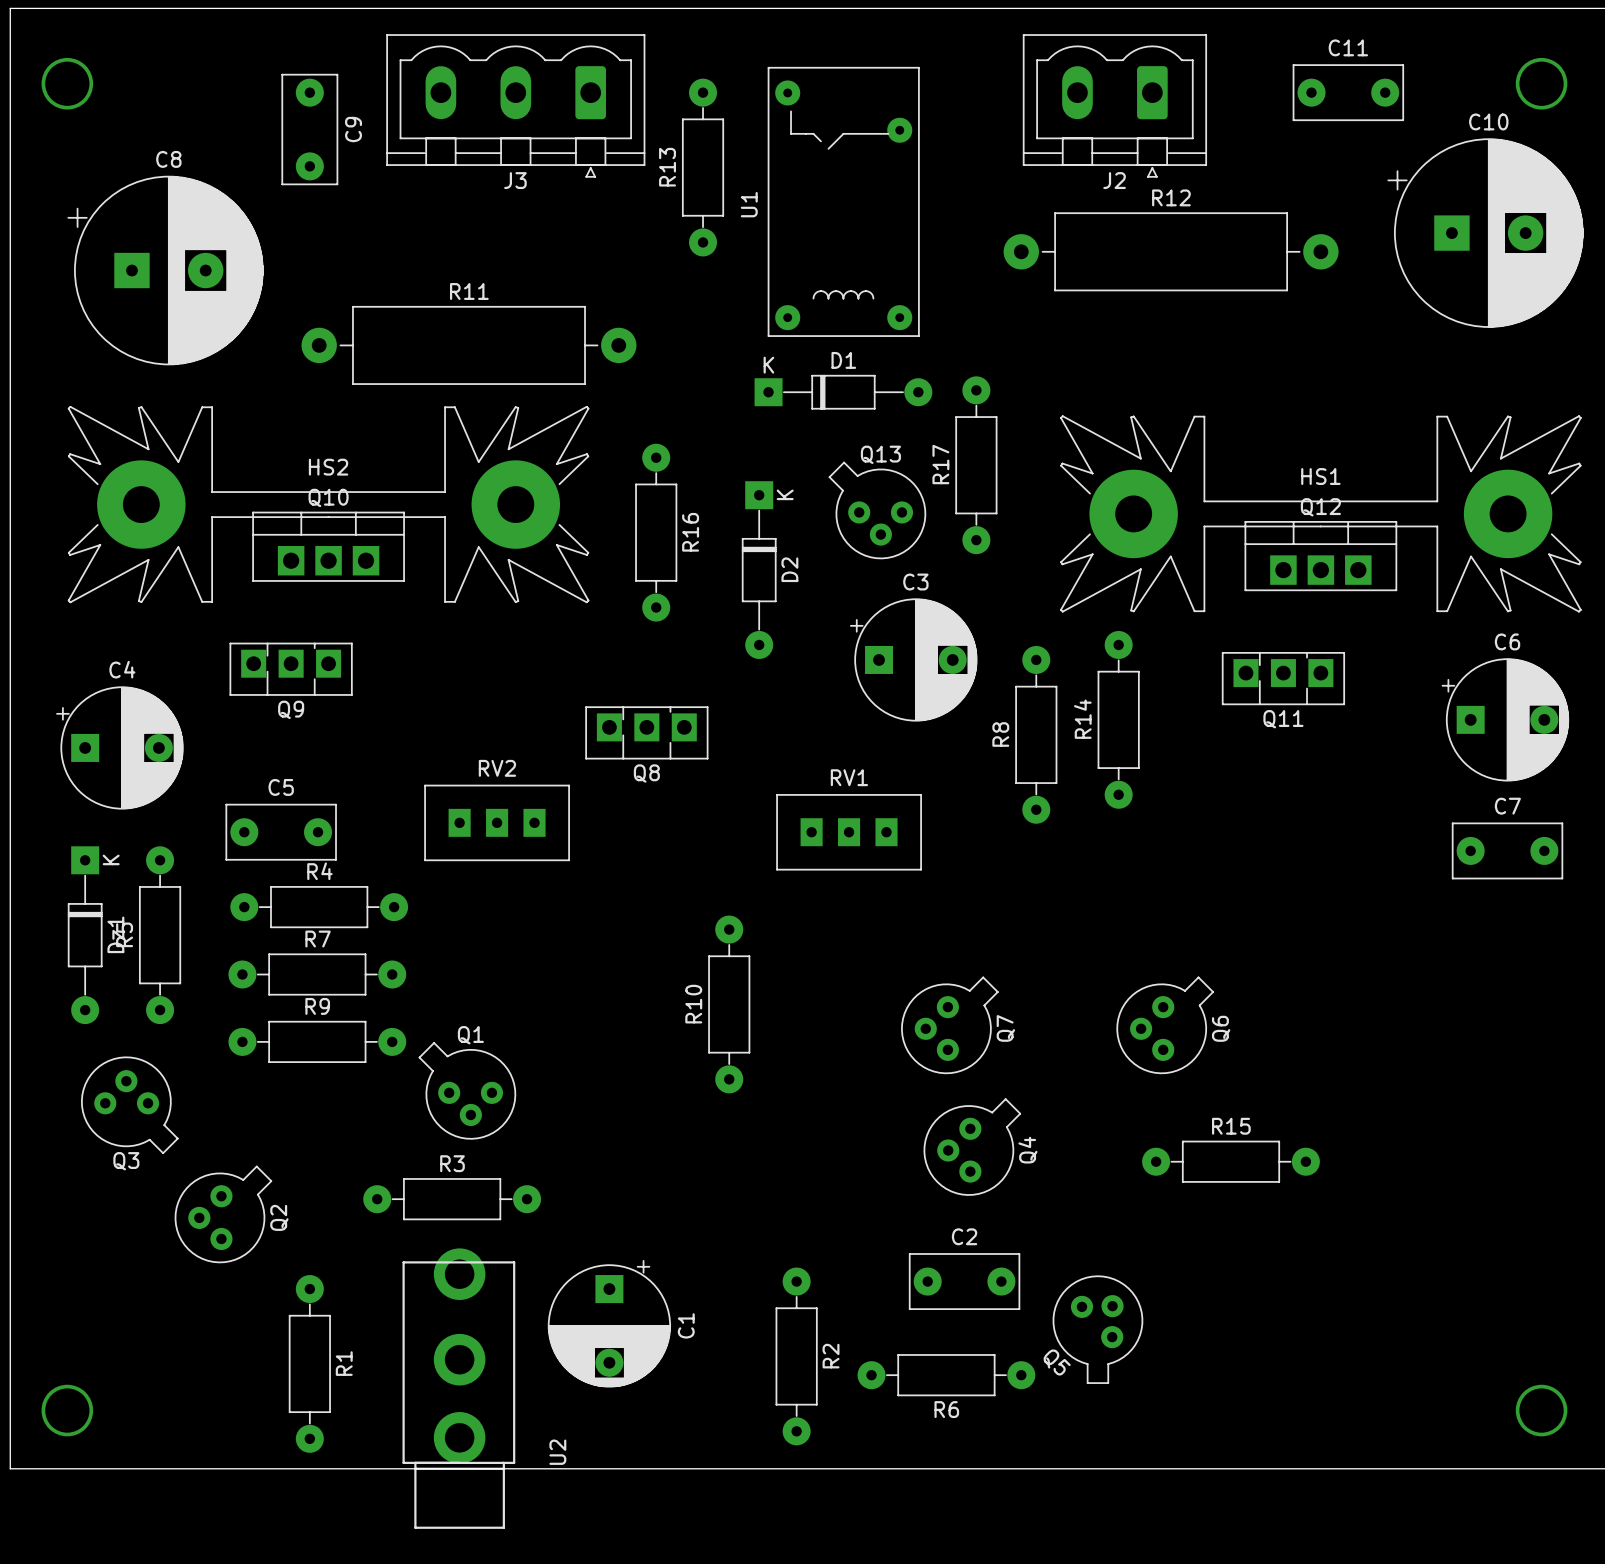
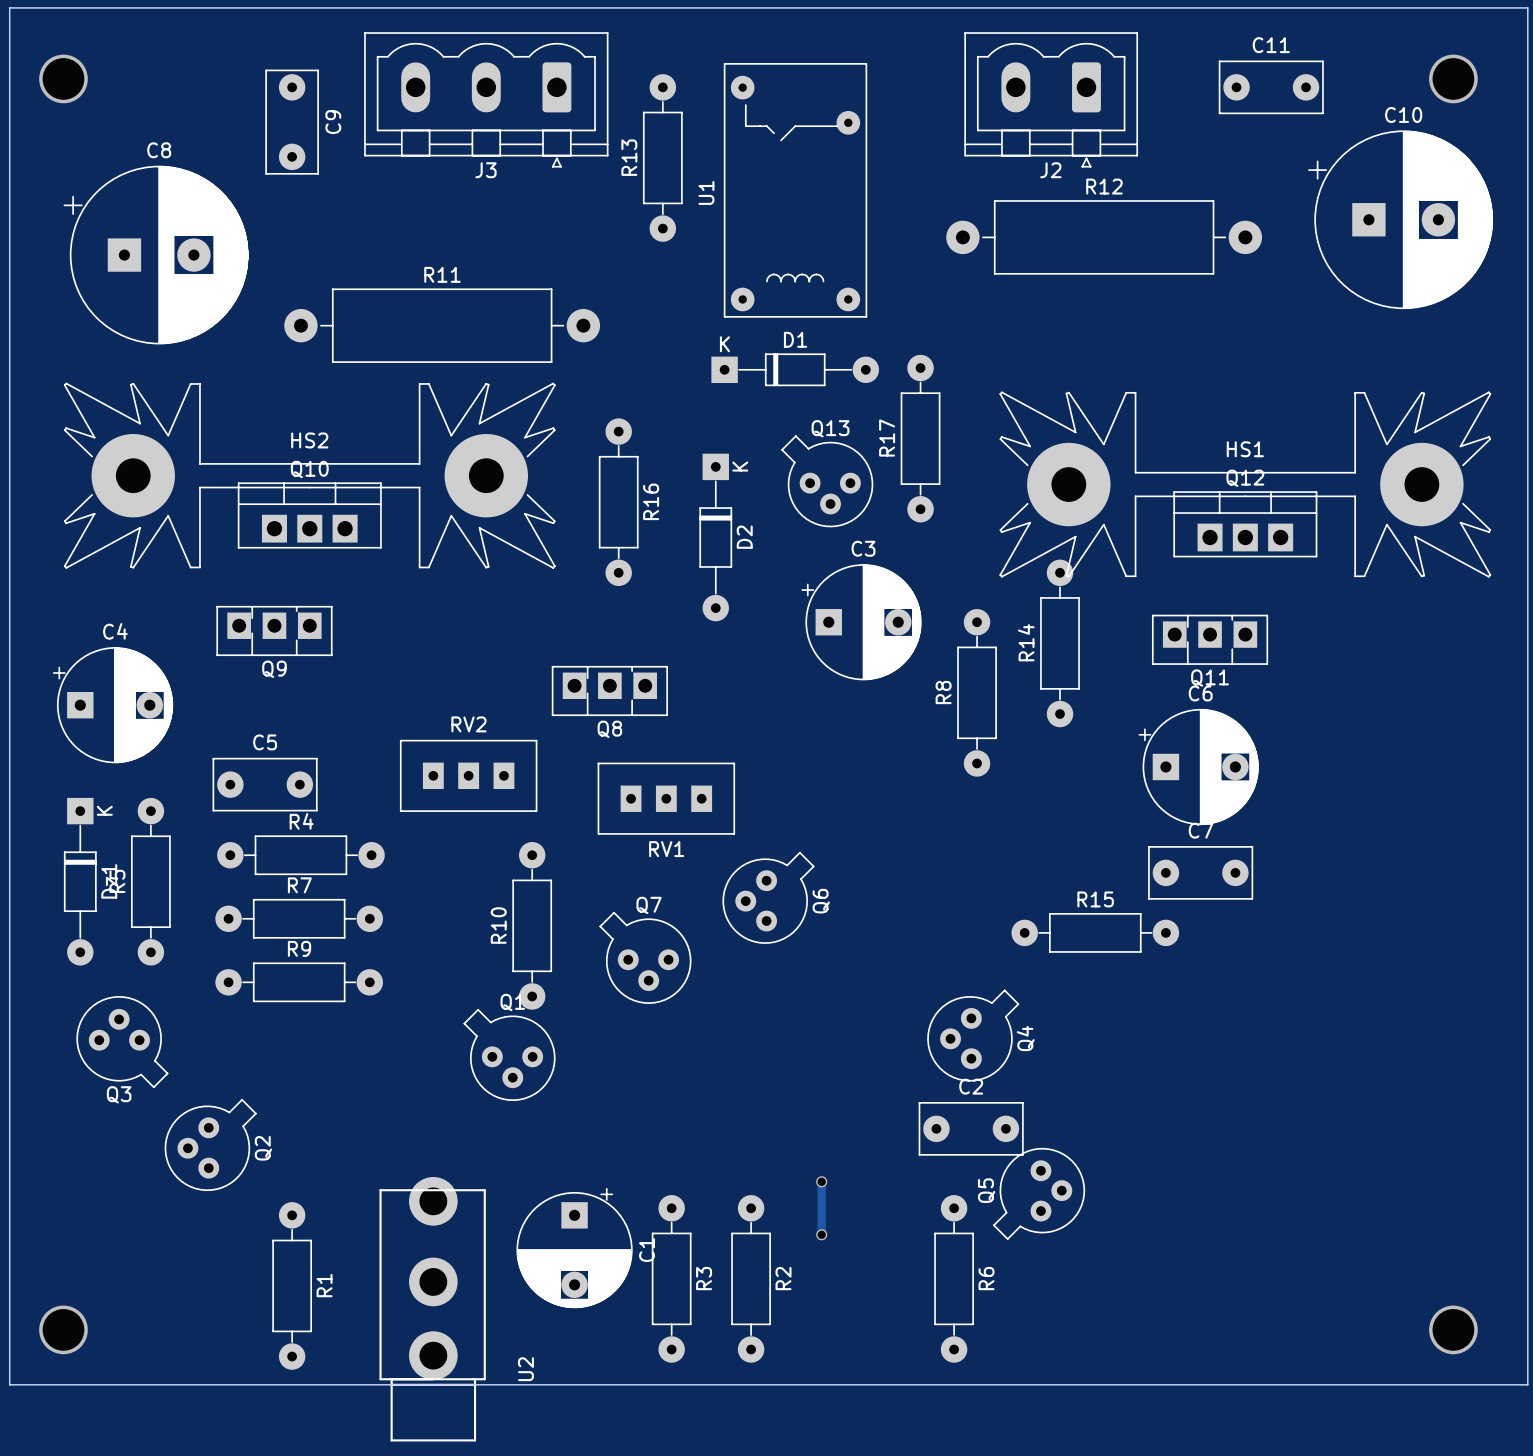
R14 position: (1118, 719) -> (1060, 643)
C6 position: (1505, 719) -> (1198, 766)
RV1 name position: RV1 (849, 777) -> RV1 (666, 849)
RV1 position: (849, 832) -> (666, 798)
C7 position: (1507, 850) -> (1200, 872)
Q6 footprint: [1116, 976, 1214, 1075] -> [722, 851, 815, 944]
R10 position: (729, 1004) -> (532, 925)
Q7 rotation: 0° (949, 1025) -> 90° counterclockwise (645, 957)
Q7 position: (949, 1025) -> (645, 957)
Q1 footprint: [418, 1042, 517, 1140] -> [463, 1008, 556, 1102]
Q4 position: (972, 1147) -> (973, 1035)
R15 position: (1231, 1161) -> (1095, 932)
R3 rotation: 0° (452, 1199) -> 90° clockwise (671, 1278)
R3 position: (452, 1199) -> (671, 1278)
track: none -> (821, 1181) (821, 1234)
via: none -> (821, 1181)
Q5 footprint: [1052, 1275, 1144, 1384] -> [993, 1147, 1086, 1240]
C2 position: (964, 1281) -> (971, 1128)
via: none -> (821, 1234)
Q5 name position: Q5 (1057, 1362) -> Q5 (986, 1190)
R6 rotation: 0° (946, 1375) -> 90° clockwise (954, 1278)
R6 name position: R6 (946, 1409) -> R6 (986, 1278)

